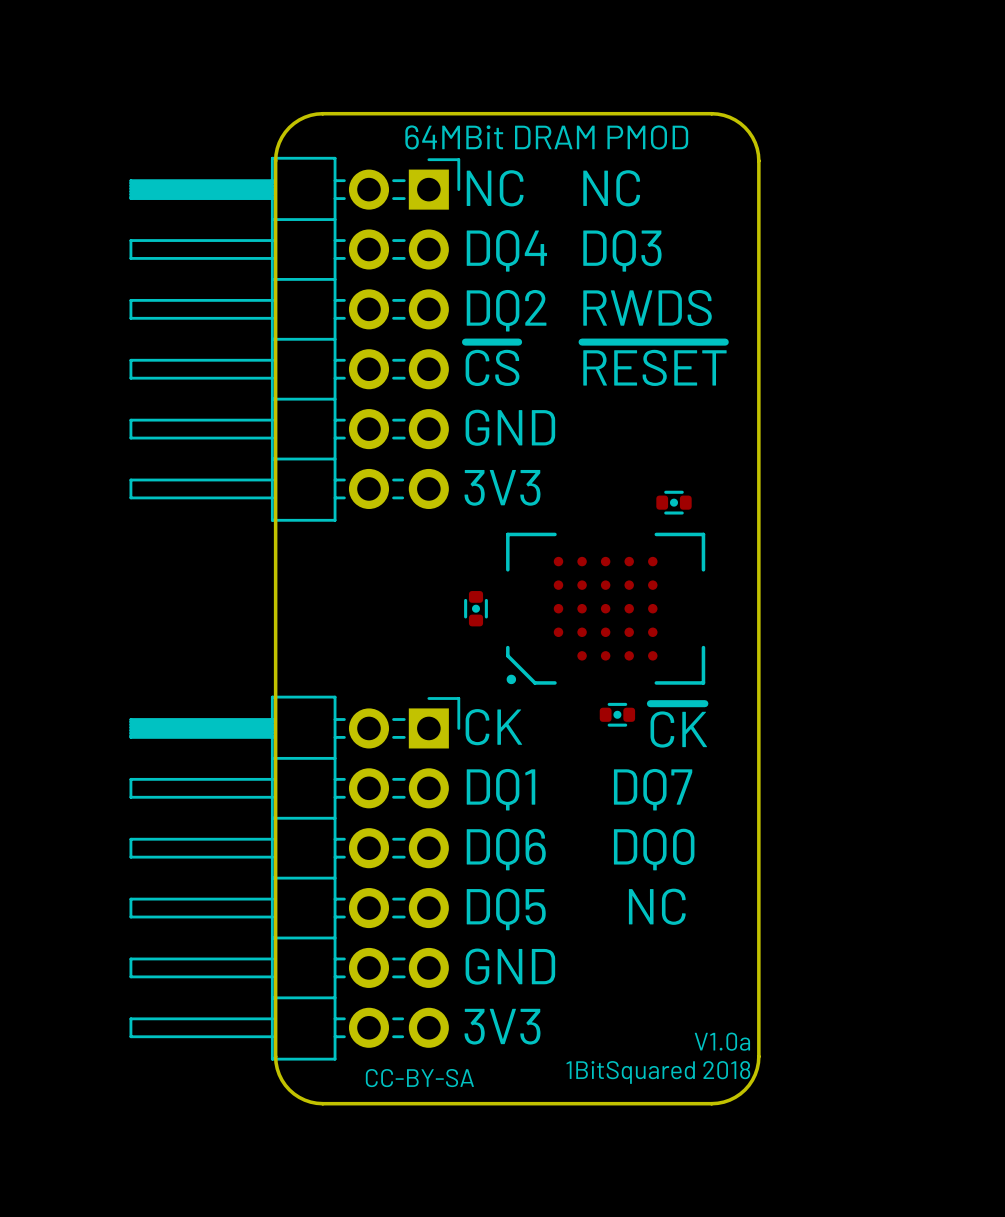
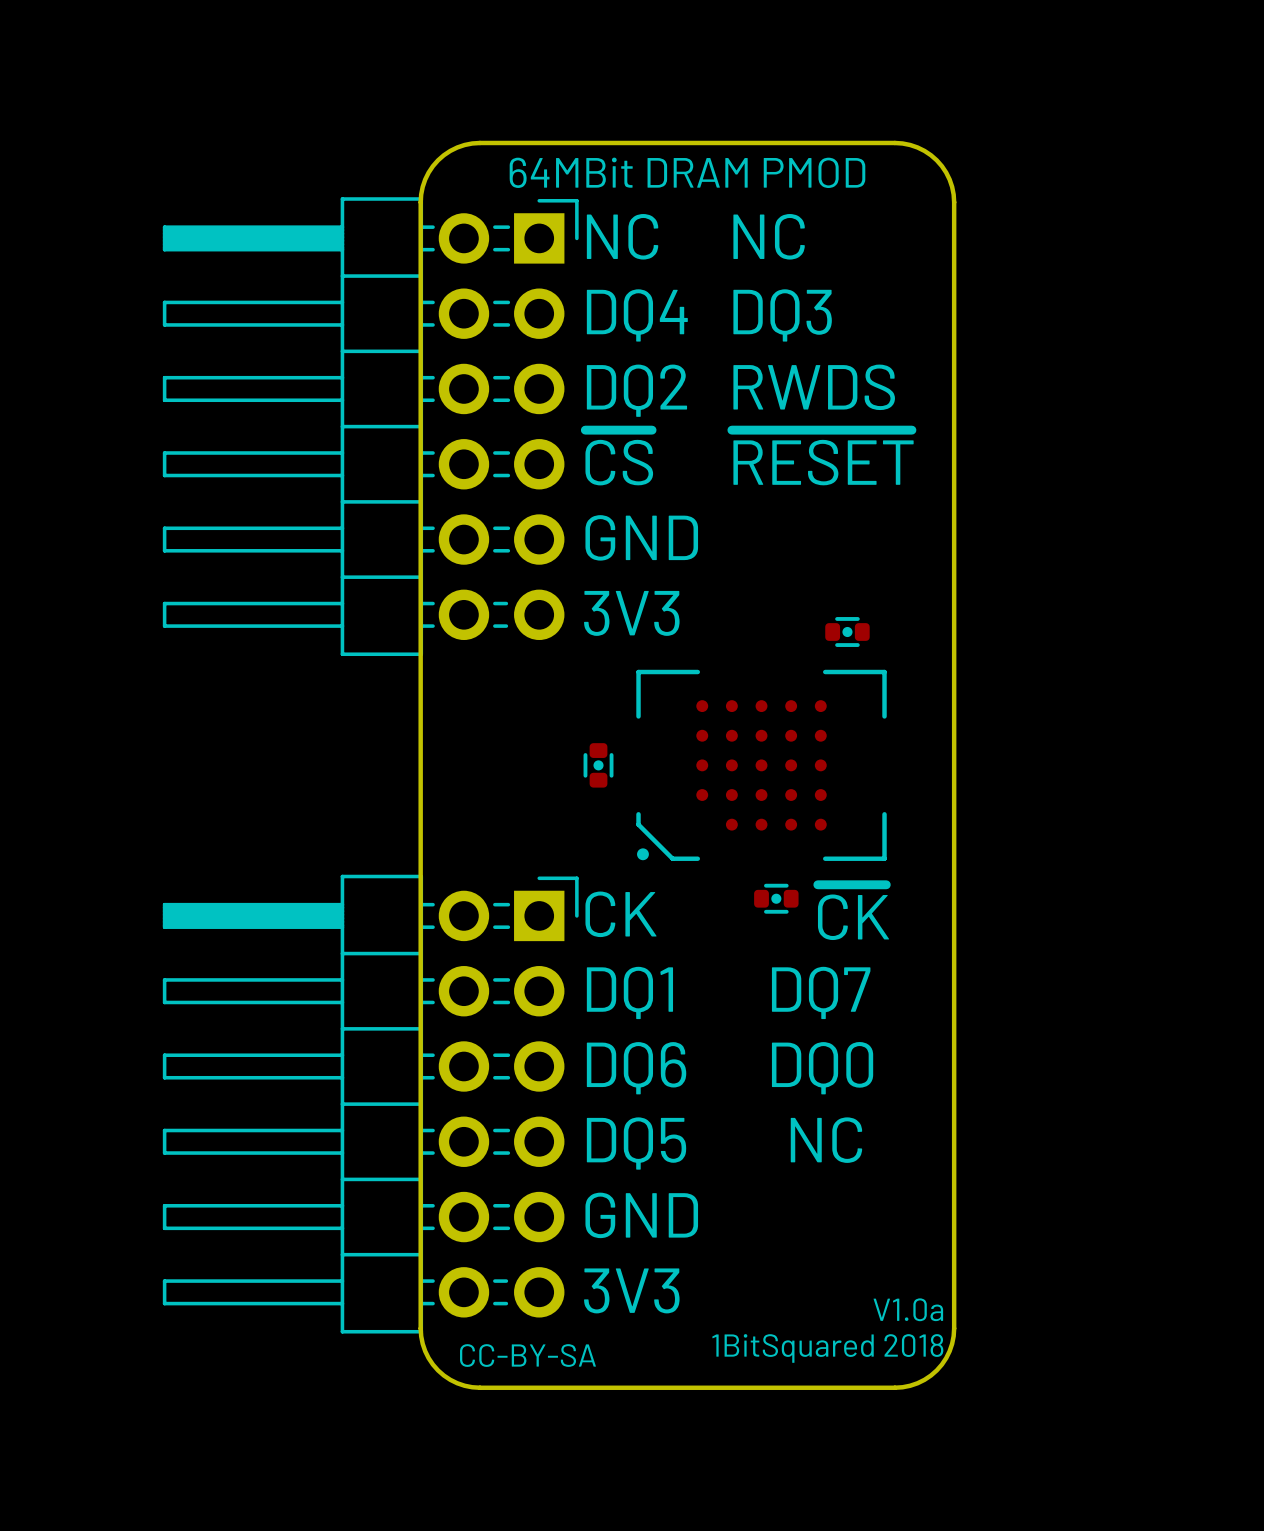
board edge: (381, 113) (322, 113) (304, 117) (294, 123) (285, 132) (277, 148) (275, 160) (276, 1062) (279, 1074) (285, 1085) (294, 1093) (304, 1100) (322, 1103) (381, 1103) -> (479, 142) (457, 147) (438, 160) (425, 179) (420, 202) (420, 1328) (425, 1351) (438, 1370) (457, 1383) (479, 1387)

